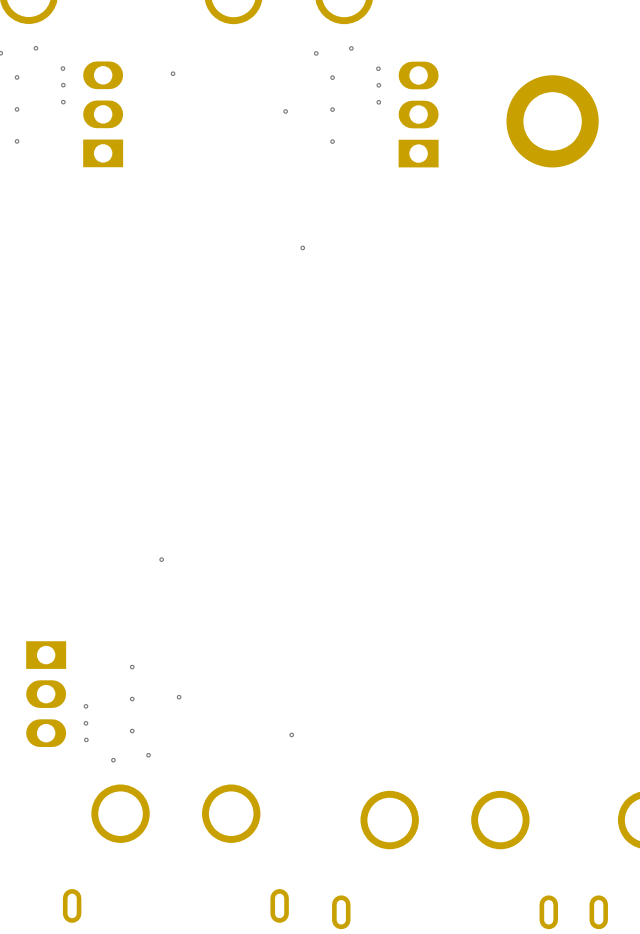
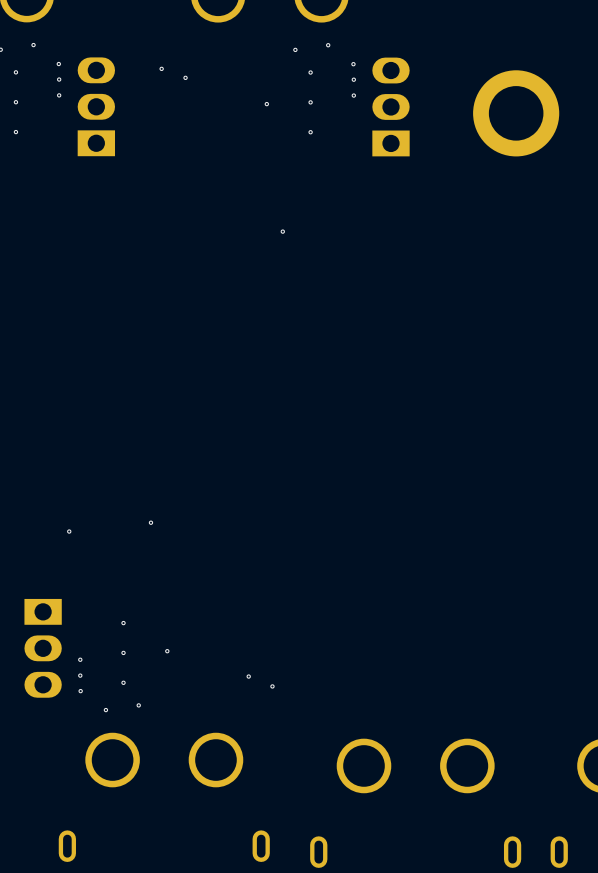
via: none -> (185, 77)
via: none -> (69, 531)
via: none -> (248, 676)

